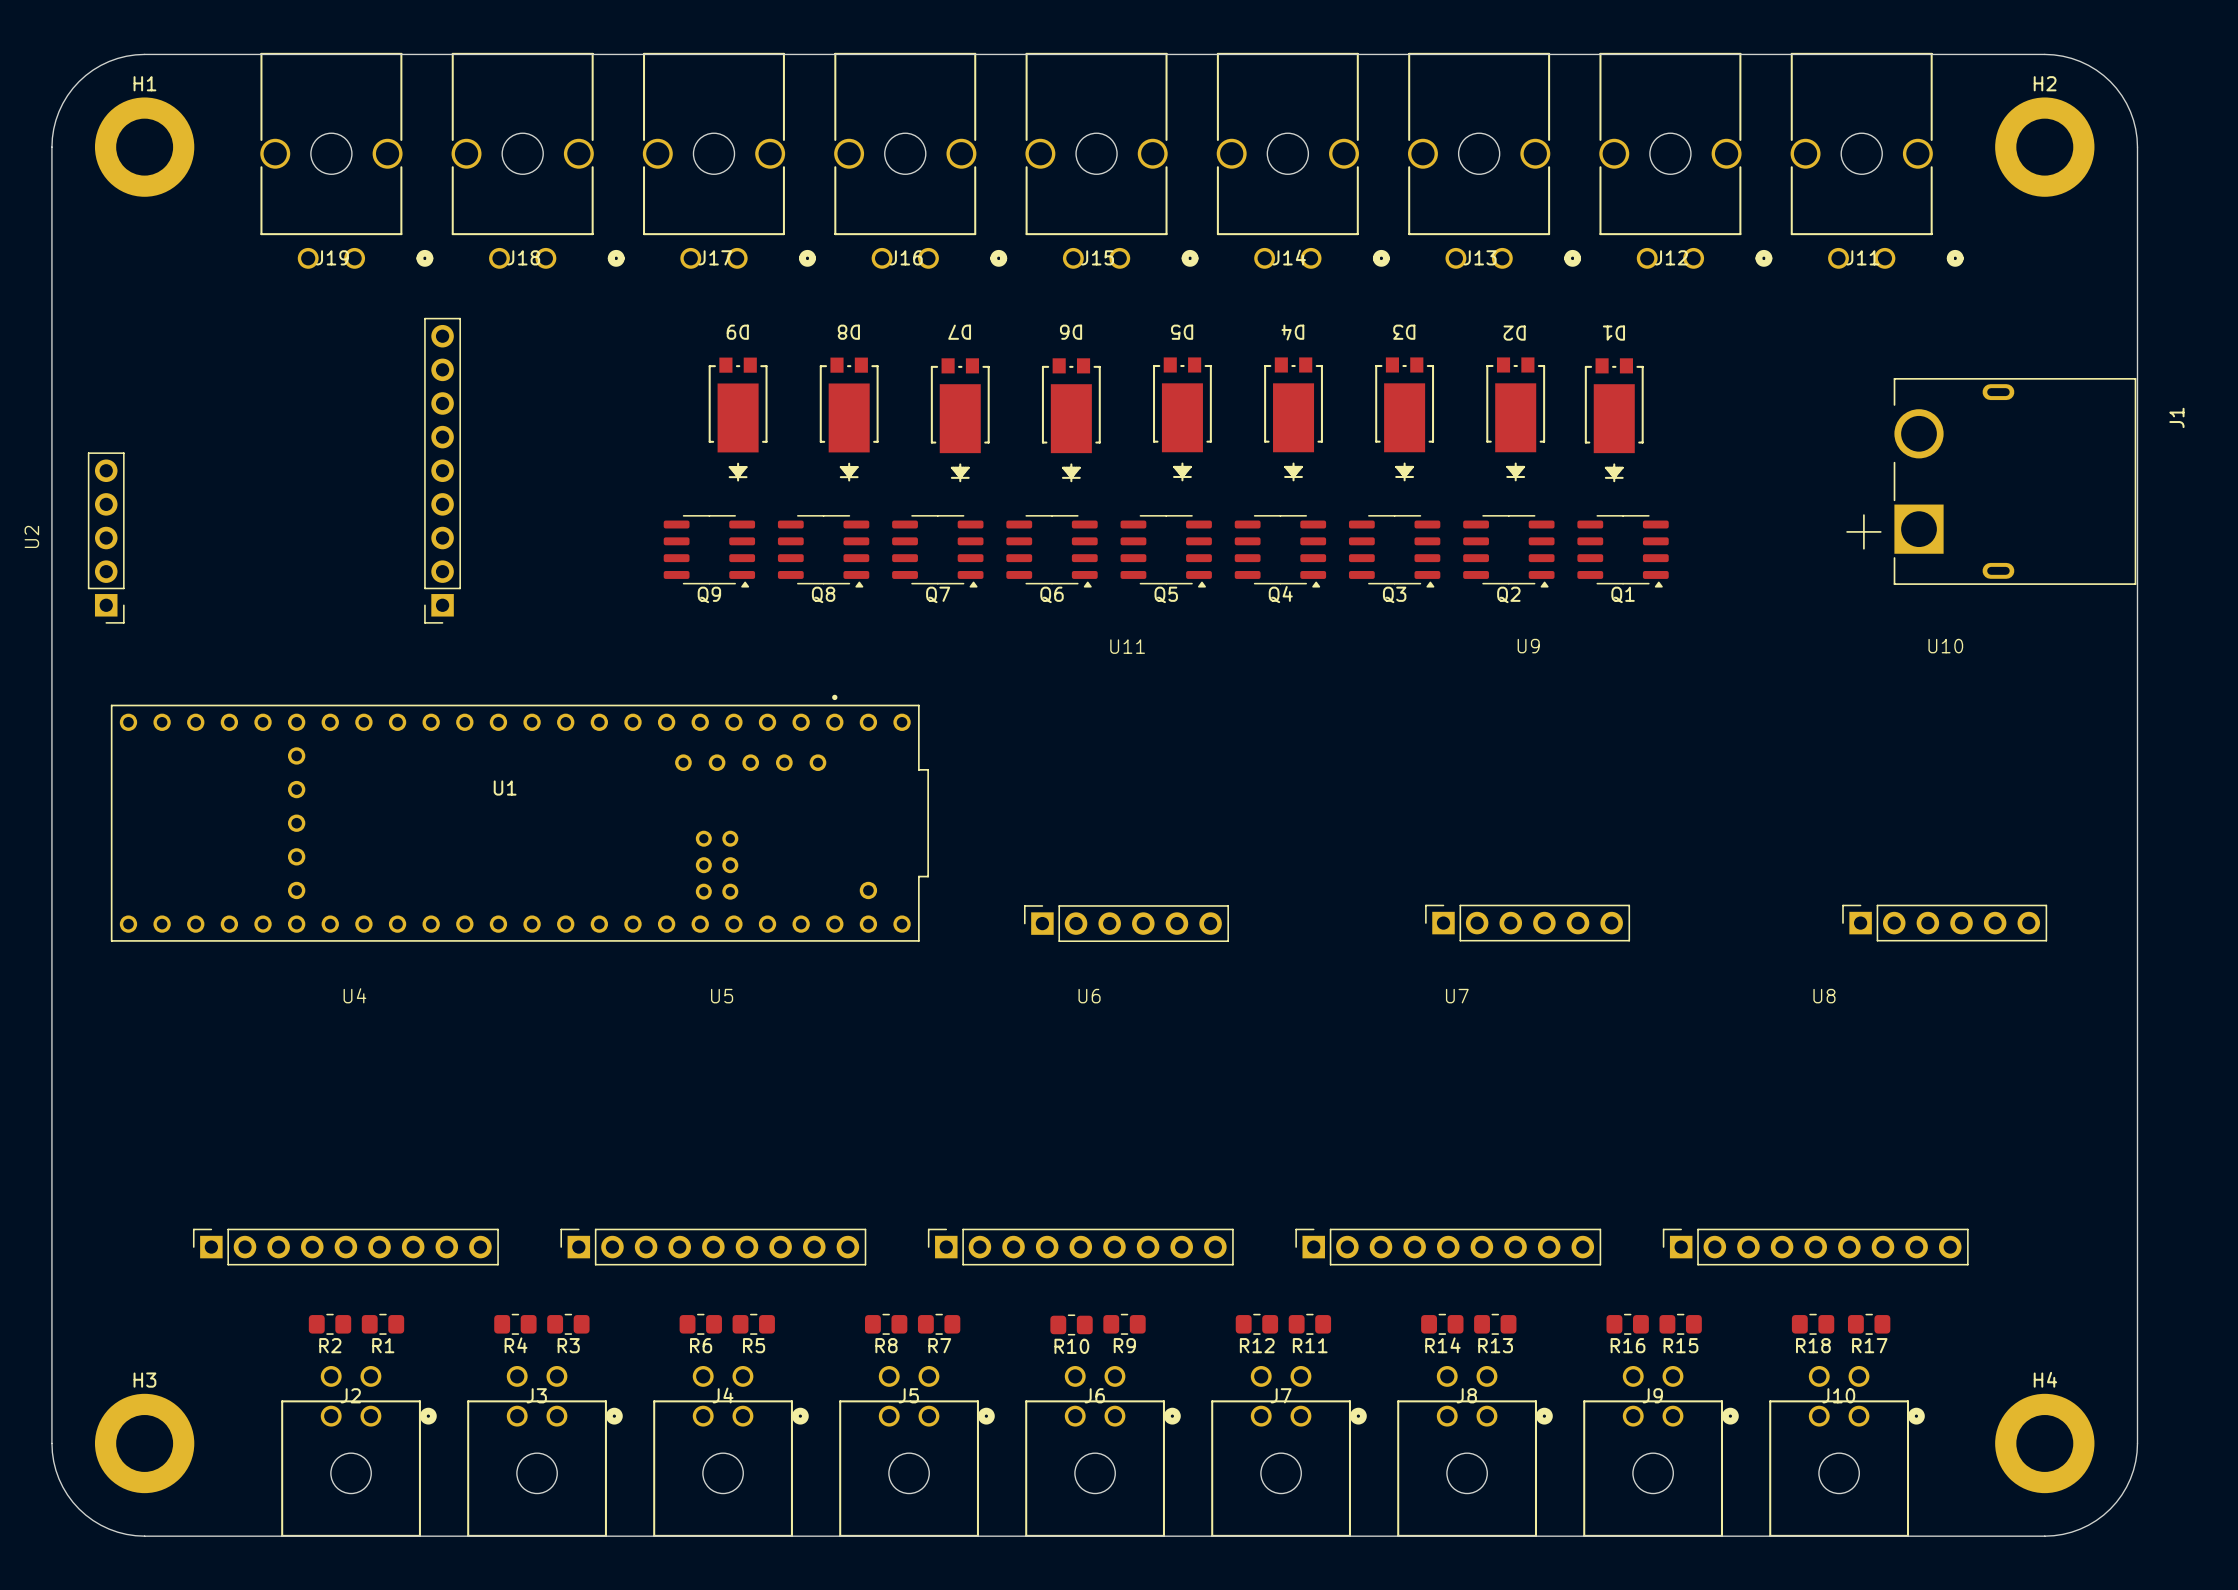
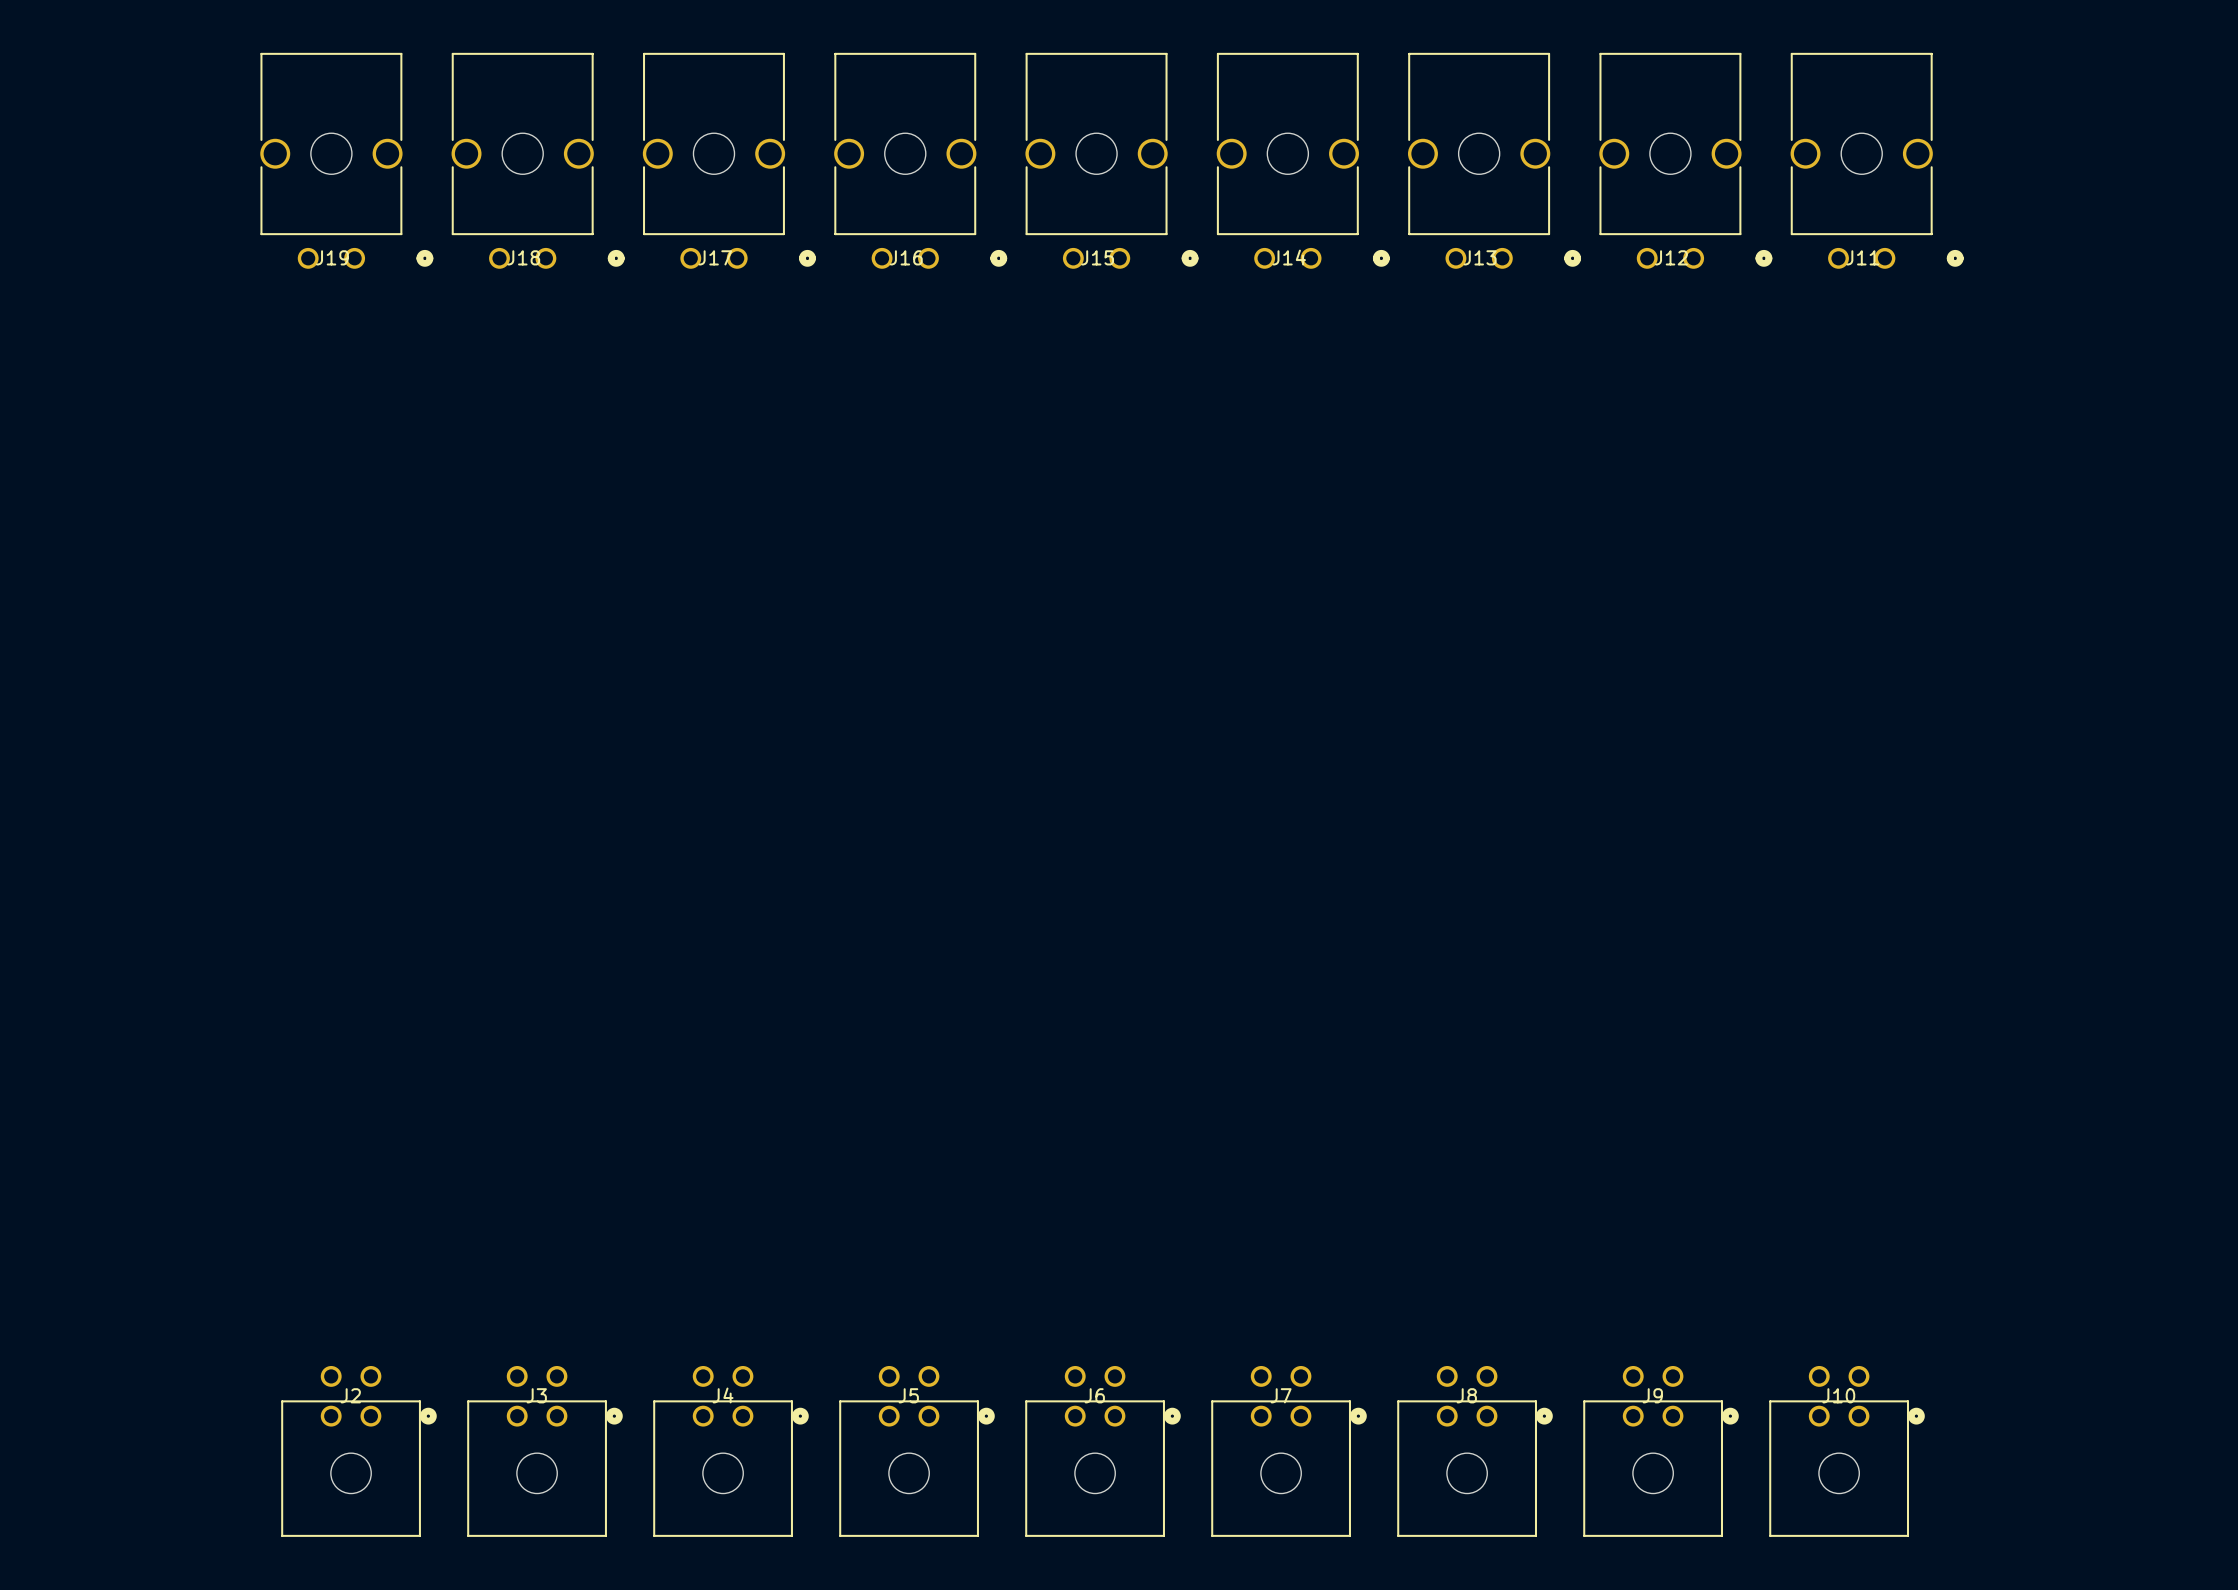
board edge: (144, 54) (2044, 54) (2071, 58) (2096, 70) (2110, 81) (2126, 103) (2135, 129) (2137, 147) (2137, 1443) (2133, 1470) (2121, 1494) (2103, 1515) (2088, 1525) (2062, 1534) (2044, 1536) (144, 1536) (117, 1532) (93, 1520) (72, 1502) (62, 1487) (53, 1461) (51, 1443) (51, 147) (53, 129) (59, 111) (67, 95) (79, 81) (93, 70) (109, 61) (126, 56) (144, 54) -> none
H1: (144, 147) -> none
H2: (2044, 147) -> none
D9: (738, 419) -> none
D8: (849, 419) -> none
D5: (1182, 419) -> none
D4: (1293, 419) -> none
D3: (1404, 419) -> none
D2: (1515, 419) -> none
D7: (960, 420) -> none
D6: (1071, 420) -> none
D1: (1614, 420) -> none
U2: (274, 470) -> none
J1: (1991, 481) -> none
Q9: (709, 551) -> none
Q8: (823, 551) -> none
Q7: (937, 551) -> none
Q6: (1052, 551) -> none
Q5: (1166, 551) -> none
Q4: (1280, 551) -> none
Q3: (1394, 551) -> none
Q2: (1508, 551) -> none
Q1: (1623, 551) -> none
U1: (519, 818) -> none
U11: (1126, 923) -> none
U9: (1527, 923) -> none
U10: (1944, 923) -> none
U4: (345, 1247) -> none
U5: (713, 1247) -> none
U6: (1080, 1247) -> none
U7: (1448, 1247) -> none
U8: (1815, 1247) -> none
R2: (330, 1324) -> none
R1: (382, 1324) -> none
R4: (515, 1324) -> none
R3: (568, 1324) -> none
R6: (700, 1324) -> none
R5: (753, 1324) -> none
R8: (886, 1324) -> none
R7: (939, 1324) -> none
R10: (1071, 1324) -> none
R9: (1124, 1324) -> none
R12: (1256, 1324) -> none
R11: (1309, 1324) -> none
R14: (1442, 1324) -> none
R13: (1495, 1324) -> none
R16: (1627, 1324) -> none
R15: (1680, 1324) -> none
R18: (1813, 1324) -> none
R17: (1869, 1324) -> none
H3: (144, 1443) -> none
H4: (2044, 1443) -> none

